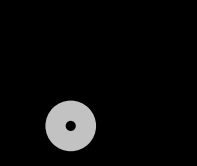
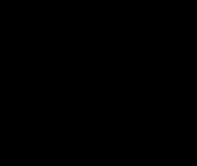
via: (70, 125) -> none

